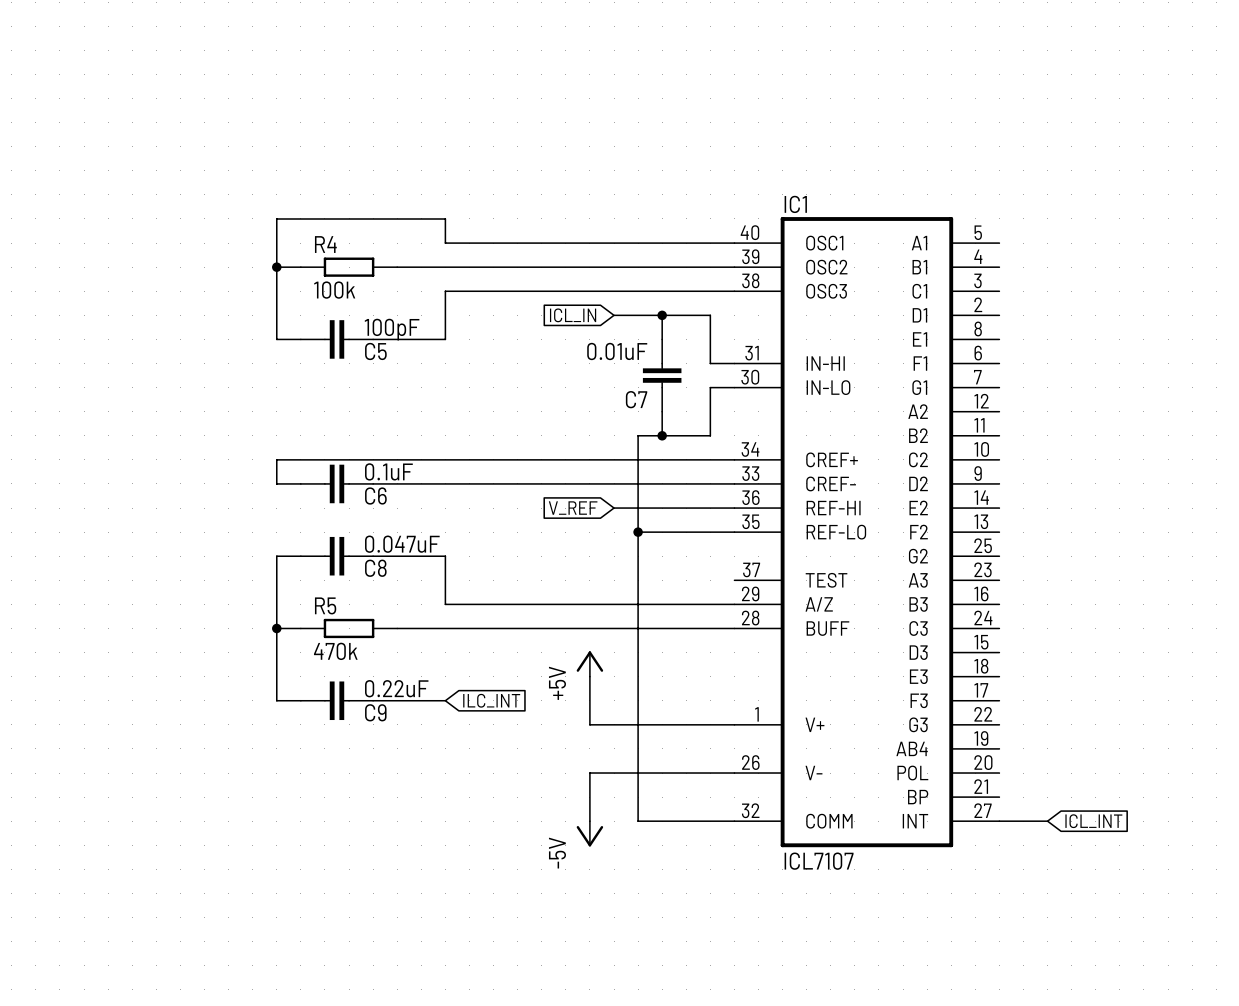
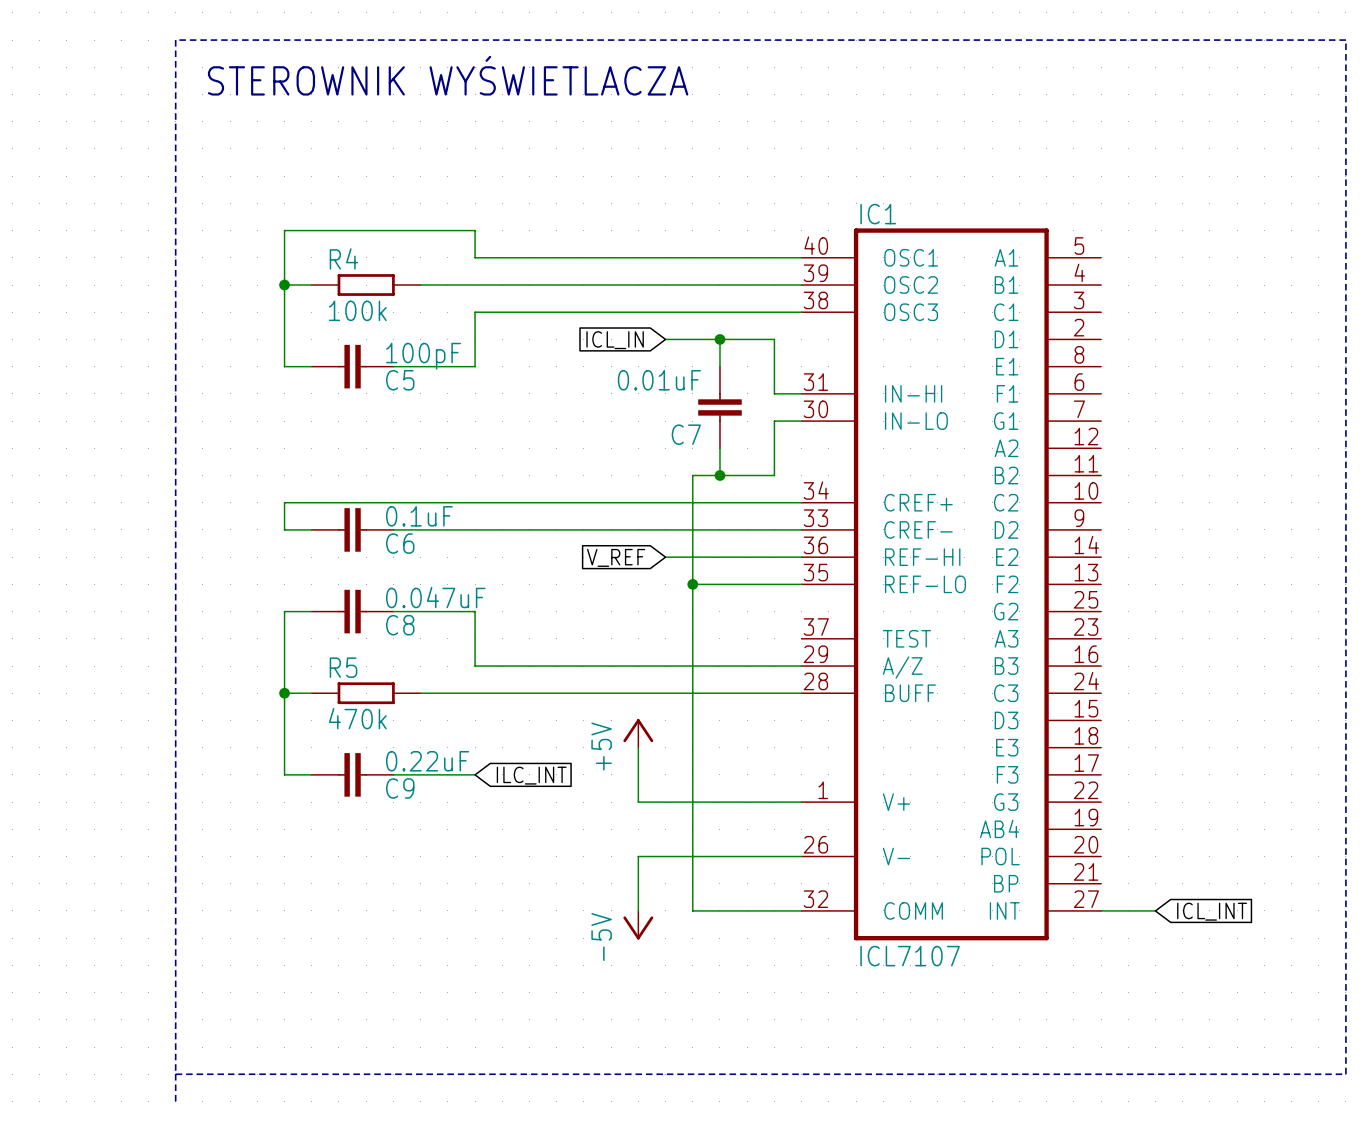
text: none -> STEROWNIK WYŚWIETLACZA (448, 75)
line: none -> (175, 1074) (1345, 1074) (1345, 40) (175, 40) (175, 1101)

